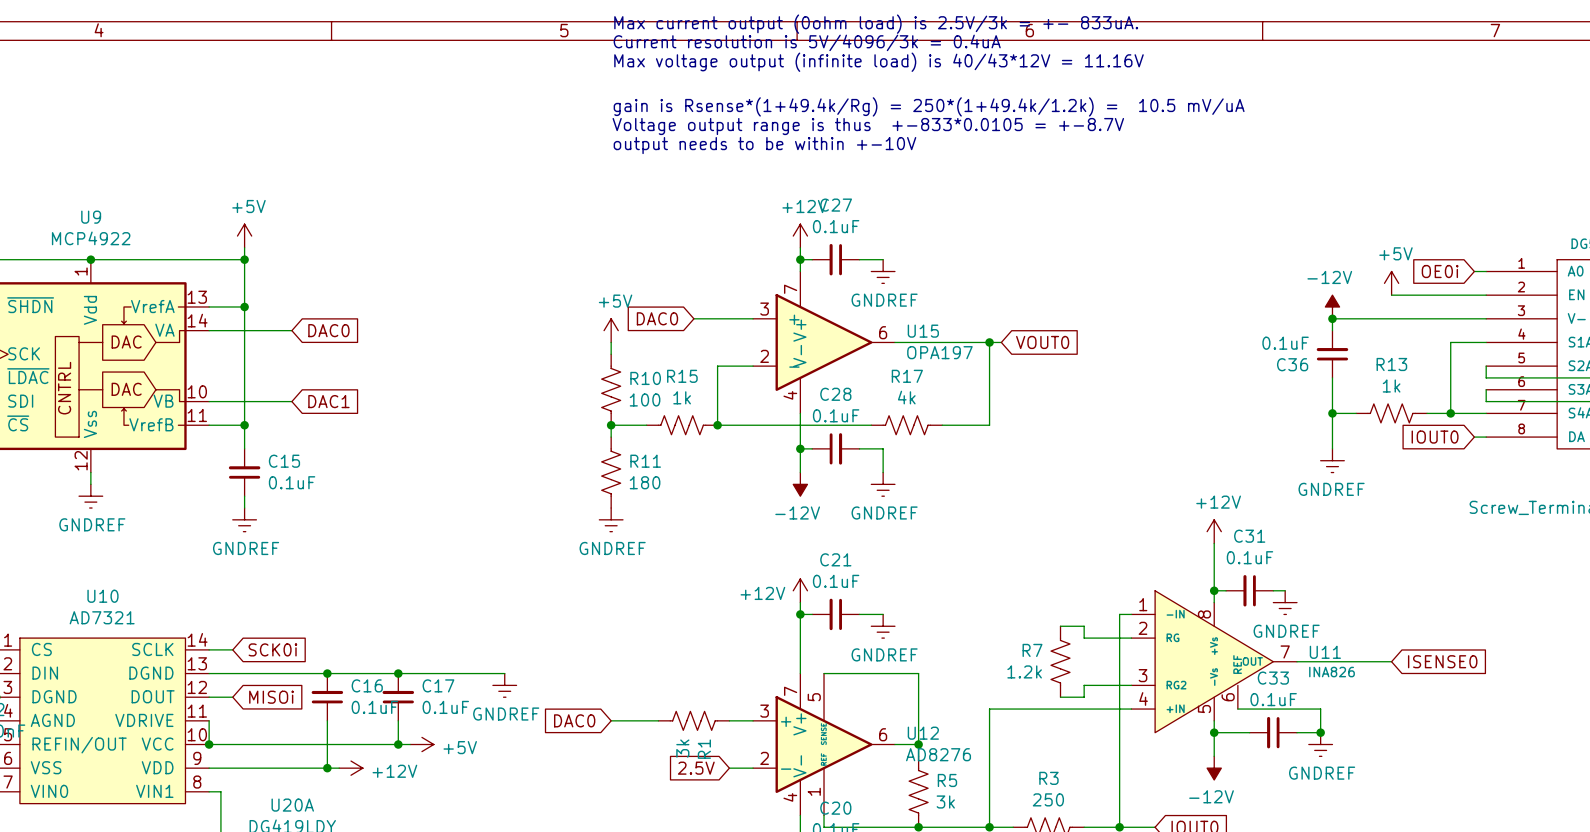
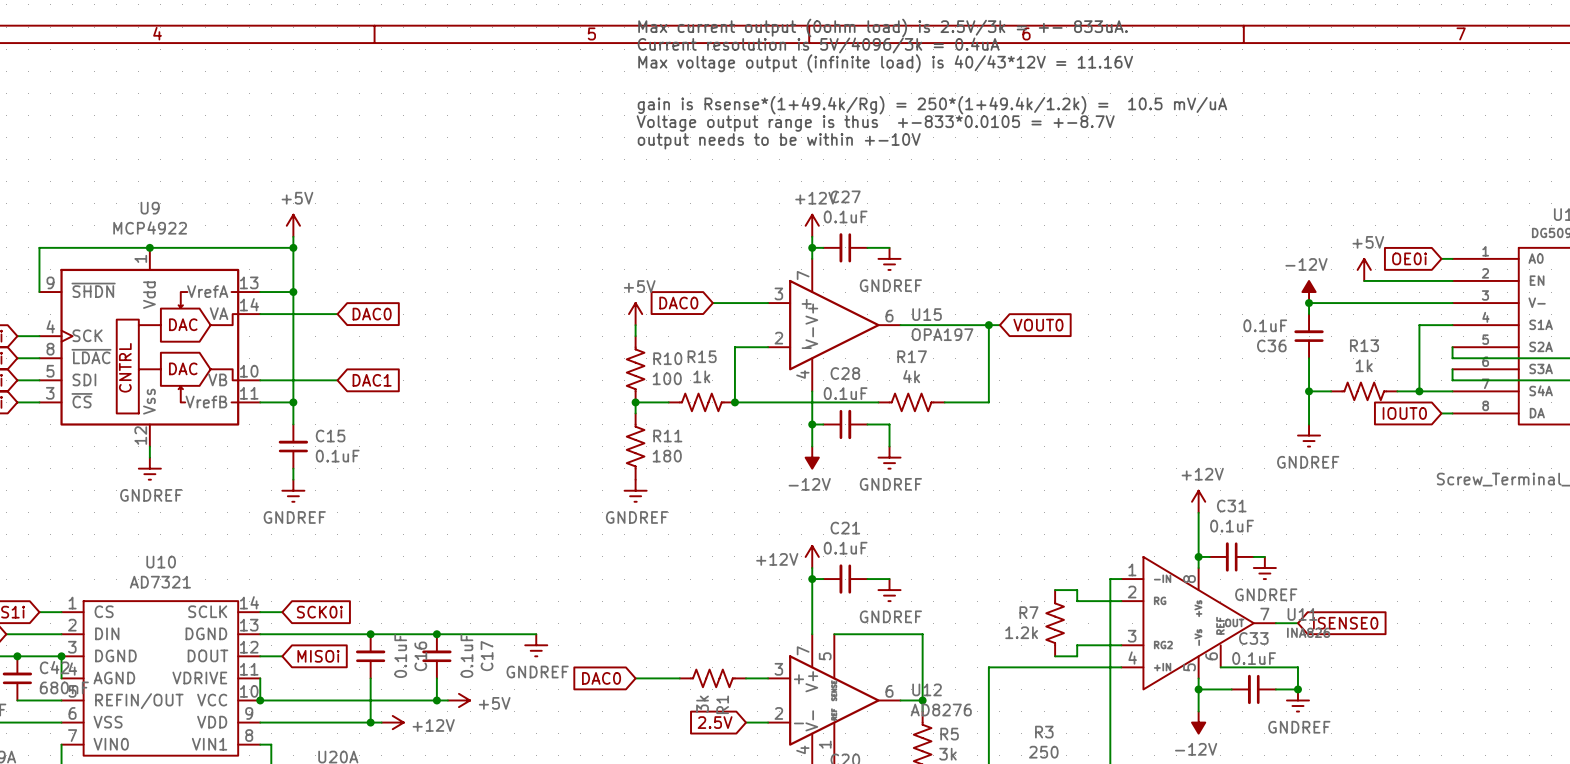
wire: (1320, 661) (1391, 661) -> none
global label position: ISENSE0 (1442, 661) -> ISENSE0 (1345, 623)
C16 name rotation: 0° (367, 685) -> 90° counterclockwise (420, 656)
C17 name rotation: 0° (438, 685) -> 90° counterclockwise (487, 656)
C16 value rotation: 0° (374, 707) -> 90° counterclockwise (400, 656)
C17 value rotation: 0° (445, 707) -> 90° counterclockwise (466, 656)

